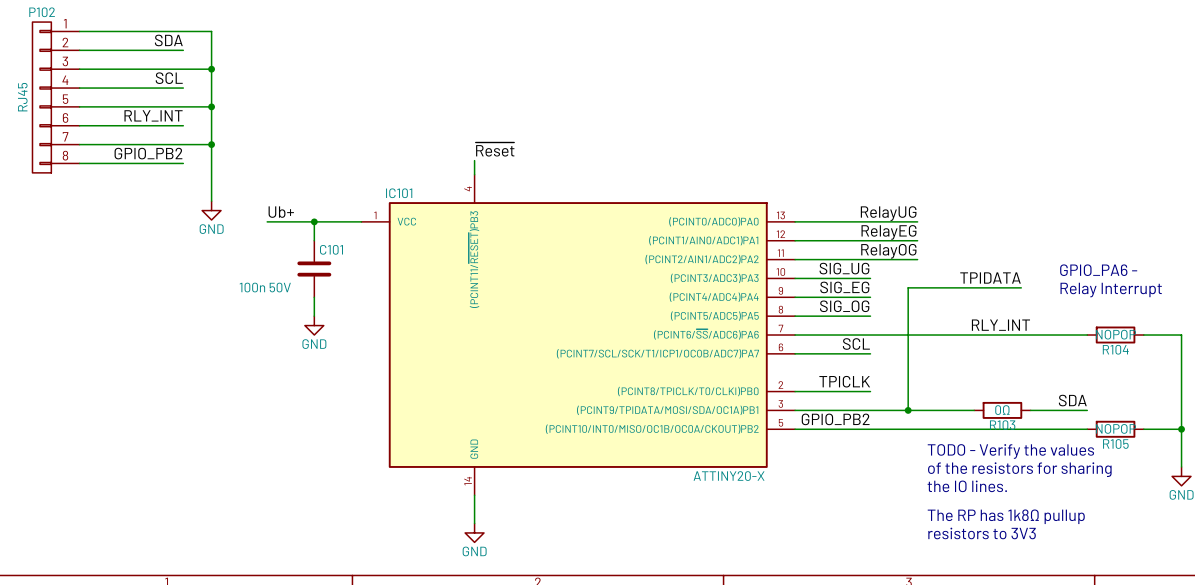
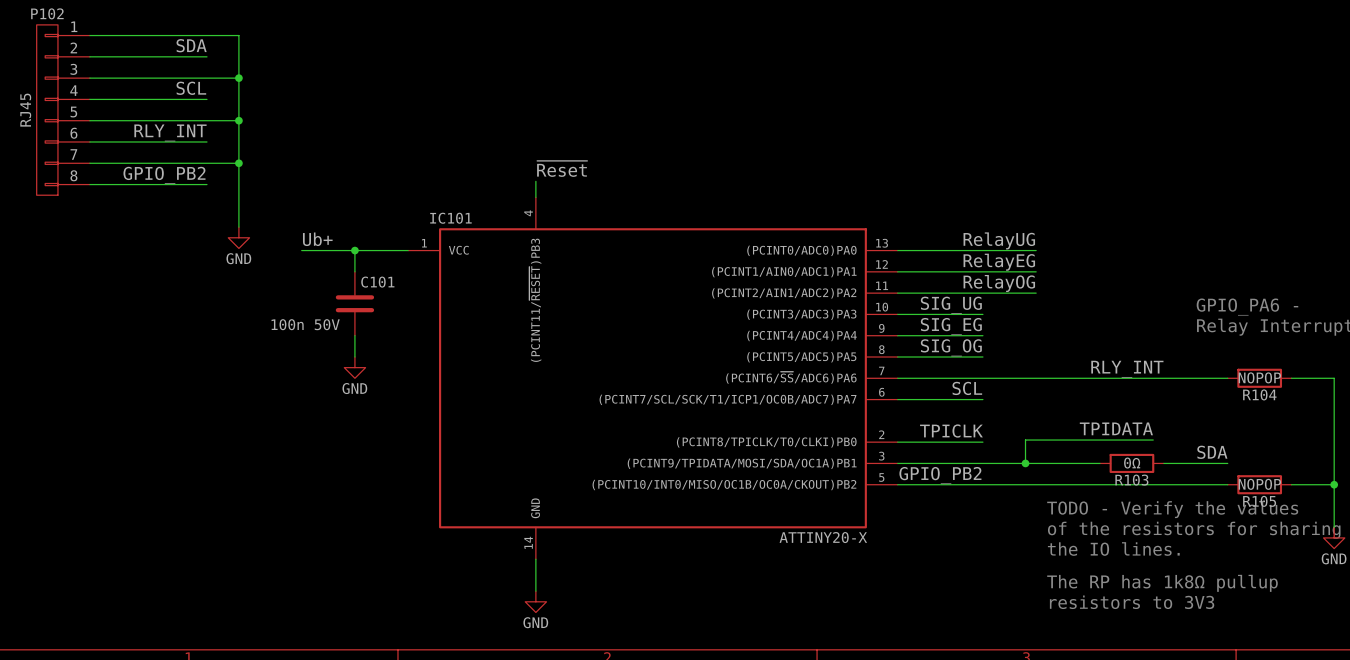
label position: TPIDATA (990, 278) -> TPIDATA (1116, 428)
wire: (1021, 287) (908, 287) (908, 389) -> (1153, 440) (1025, 440)

